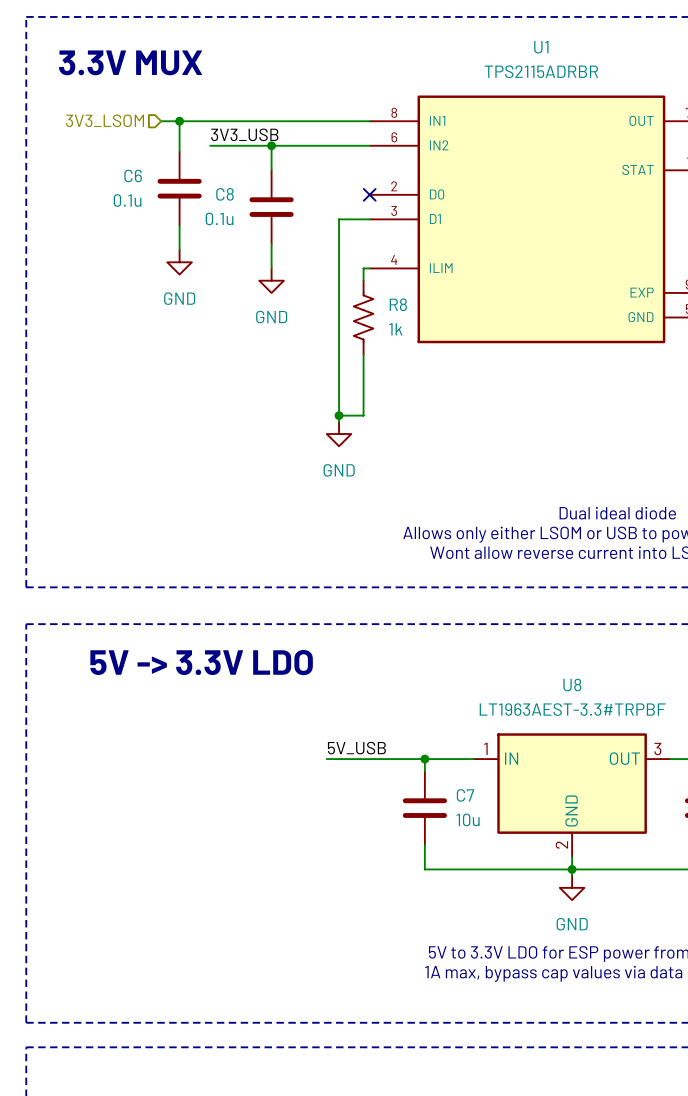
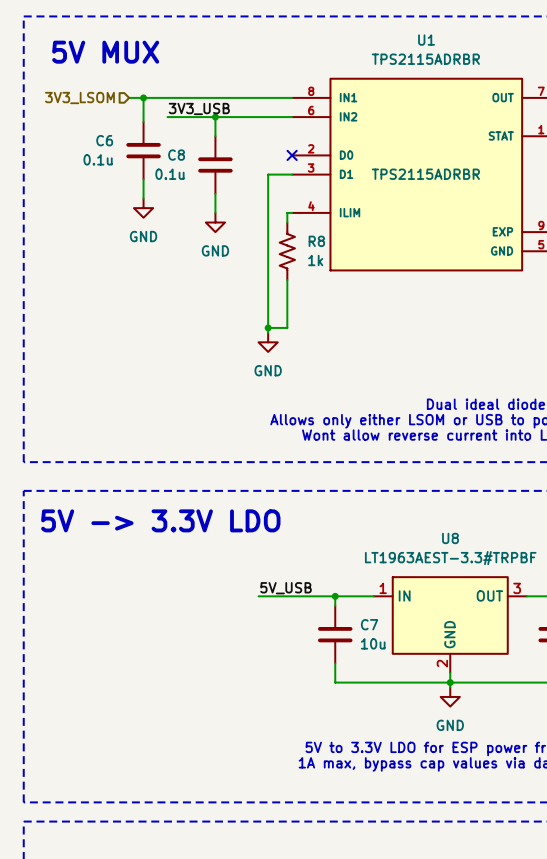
text: 3.3V MUX (130, 62) -> 5V MUX (105, 52)
U1 text: none -> TPS2115ADRBR (425, 174)

